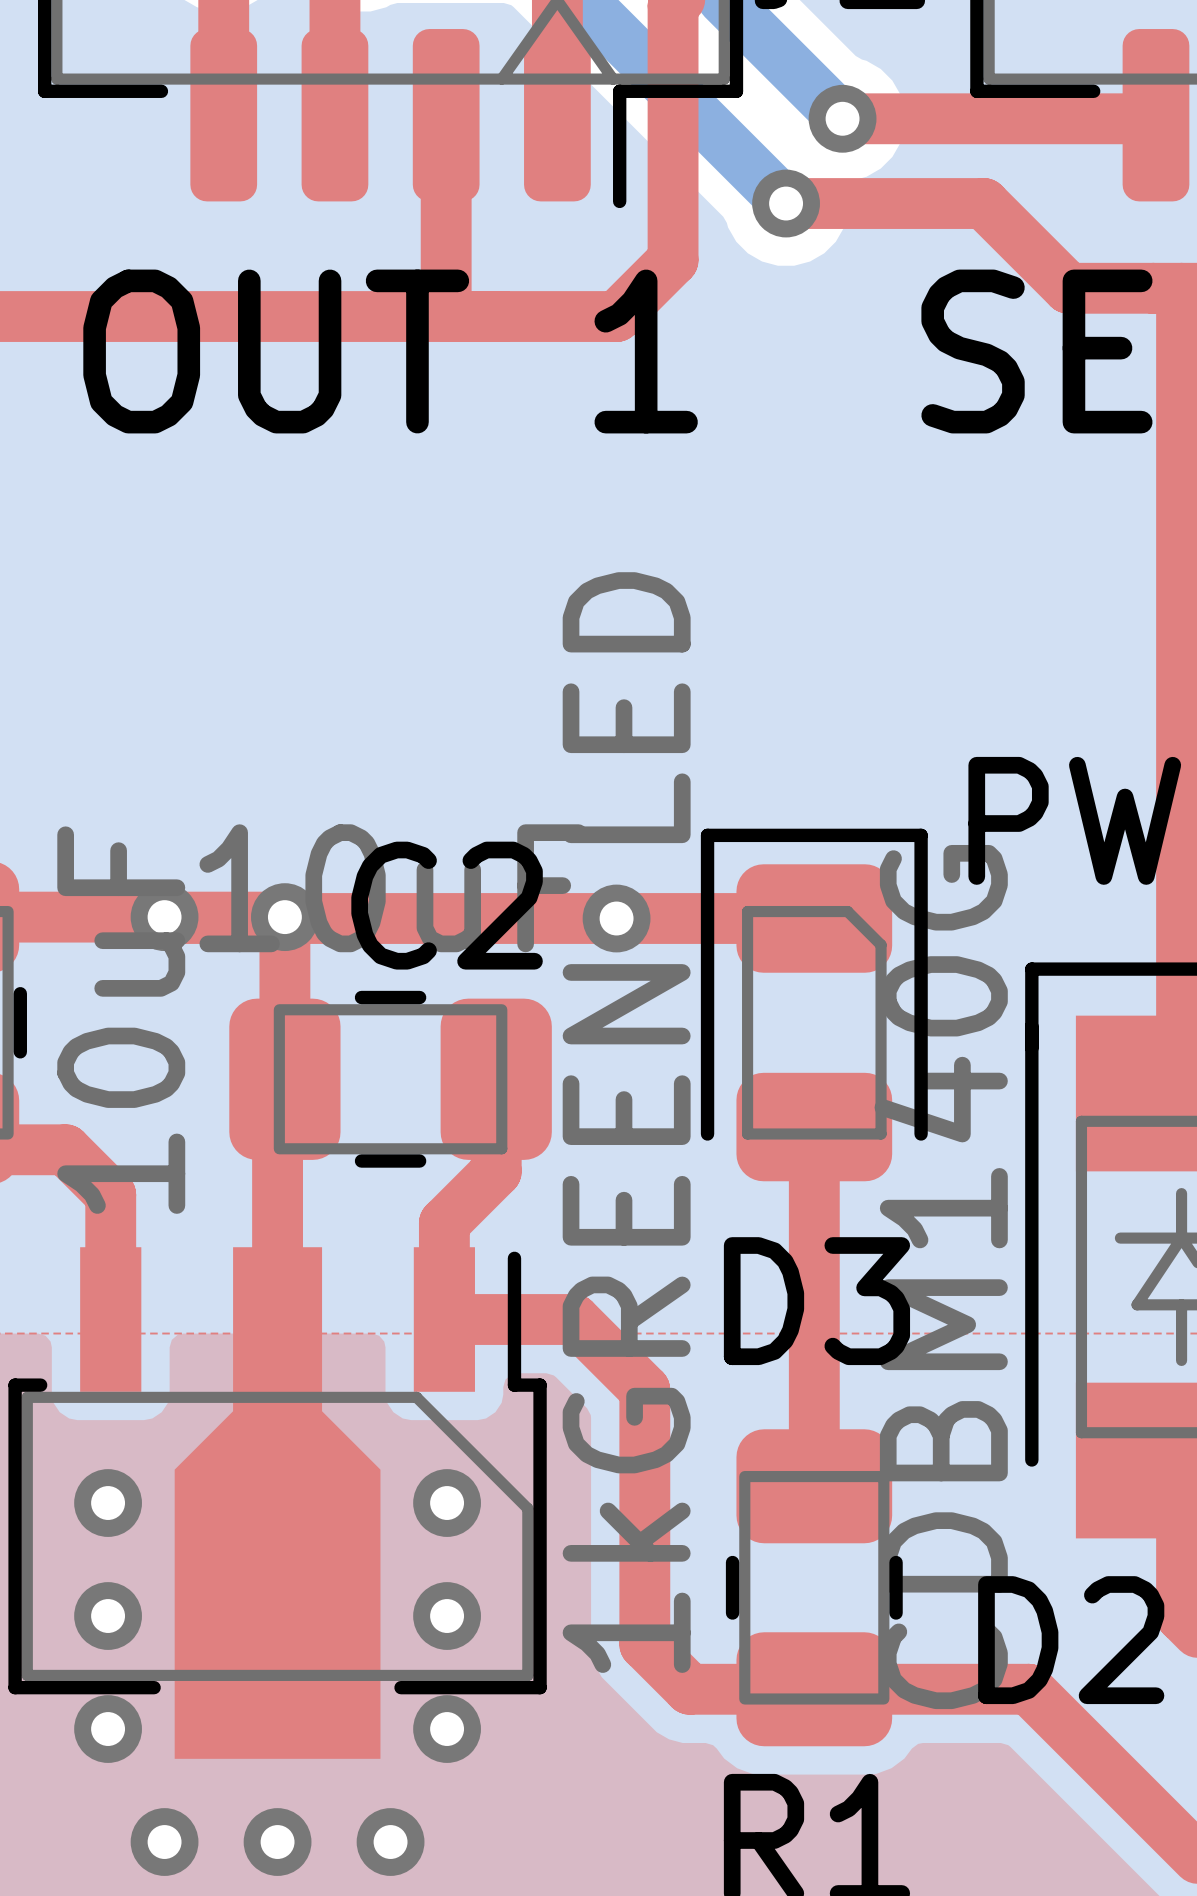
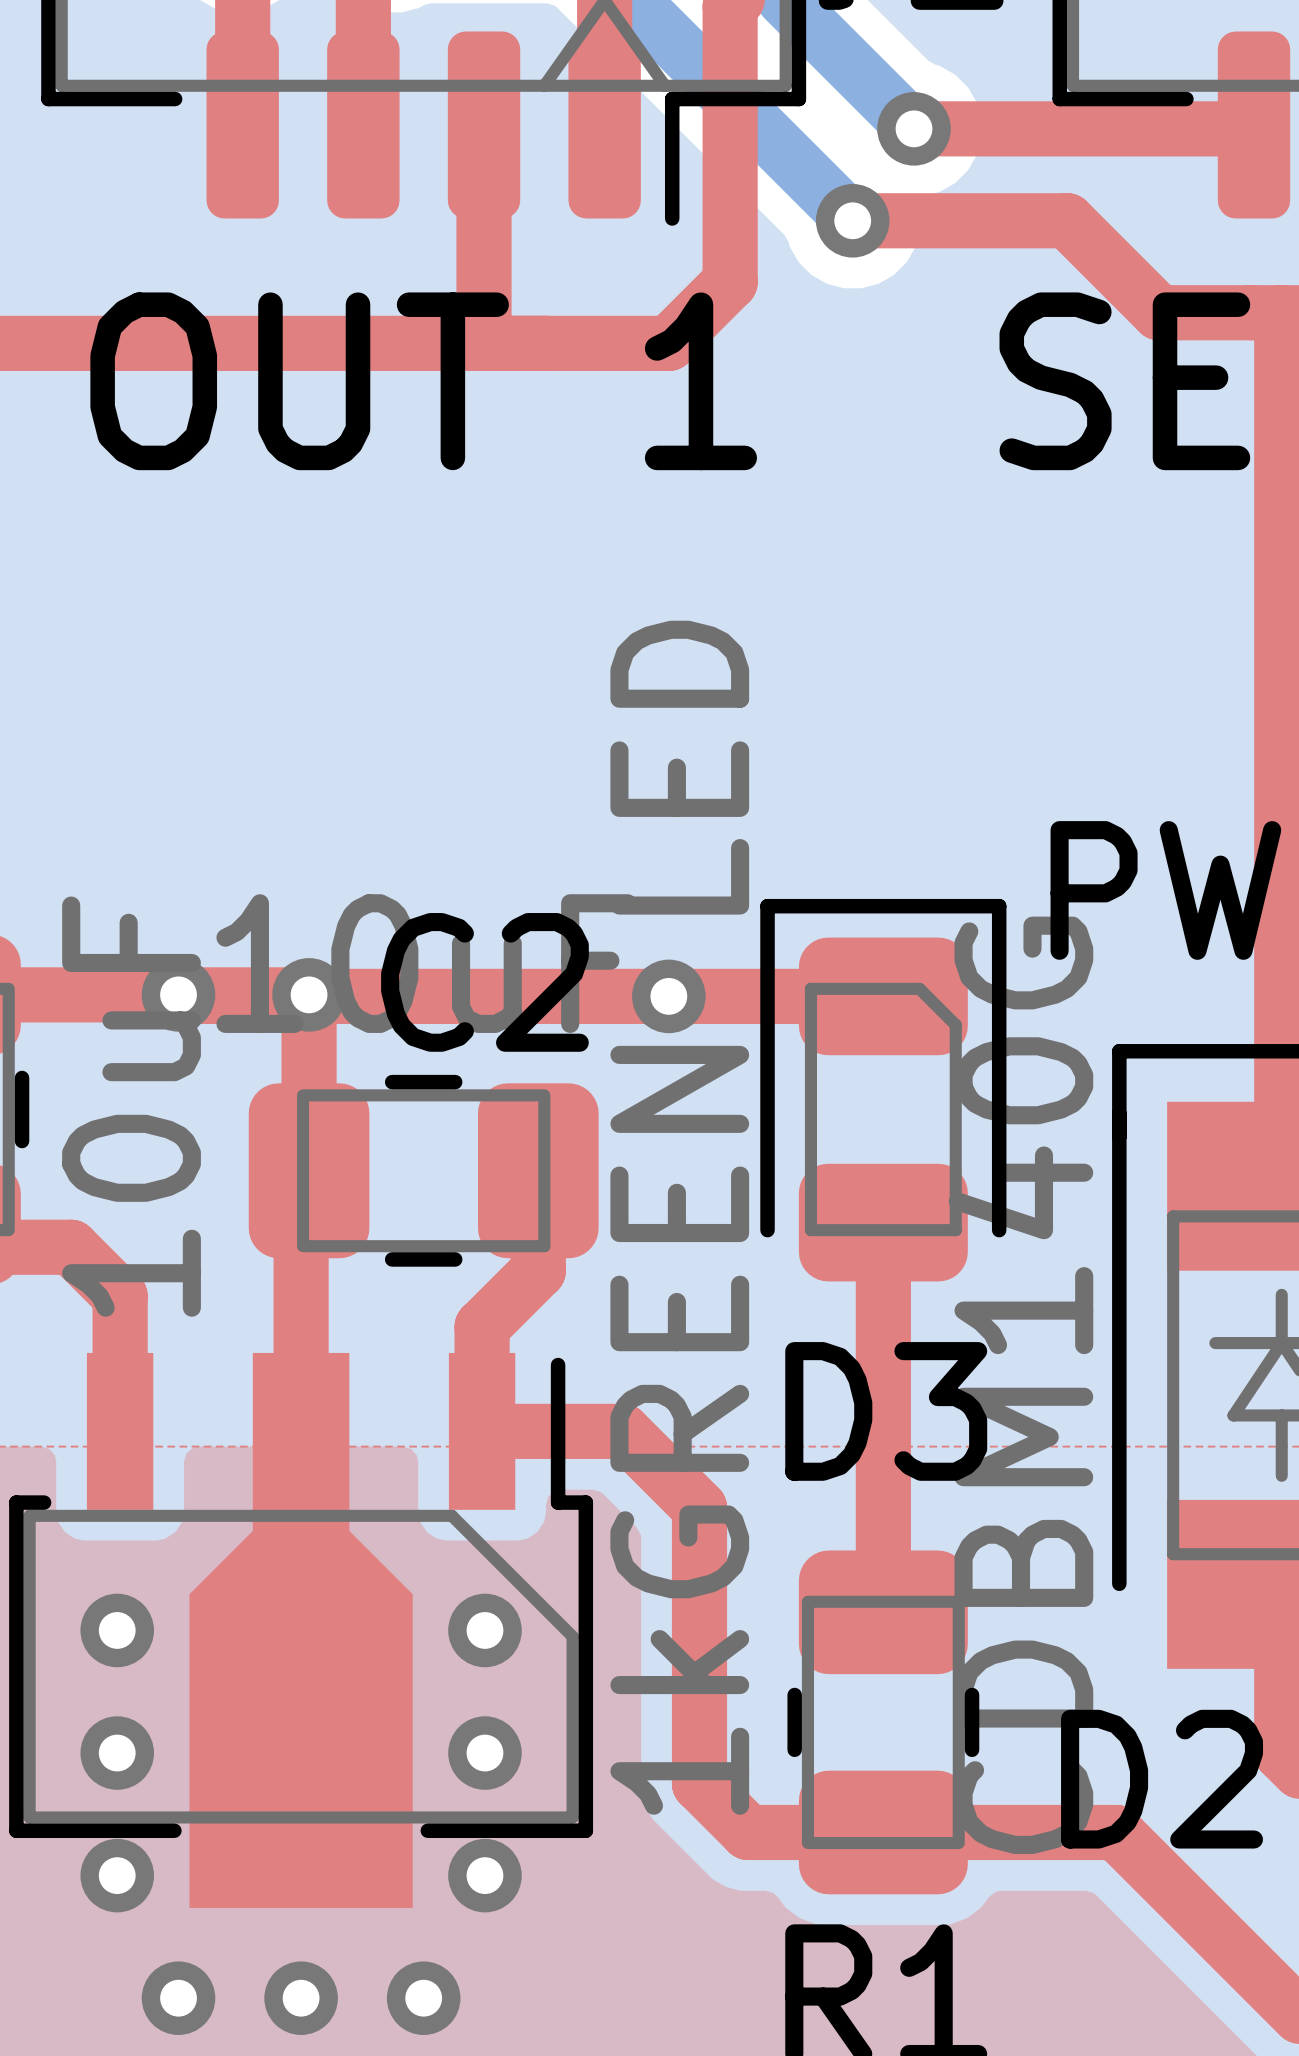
part footprint: [8, 1247, 547, 1759] -> [9, 1352, 594, 1908]

